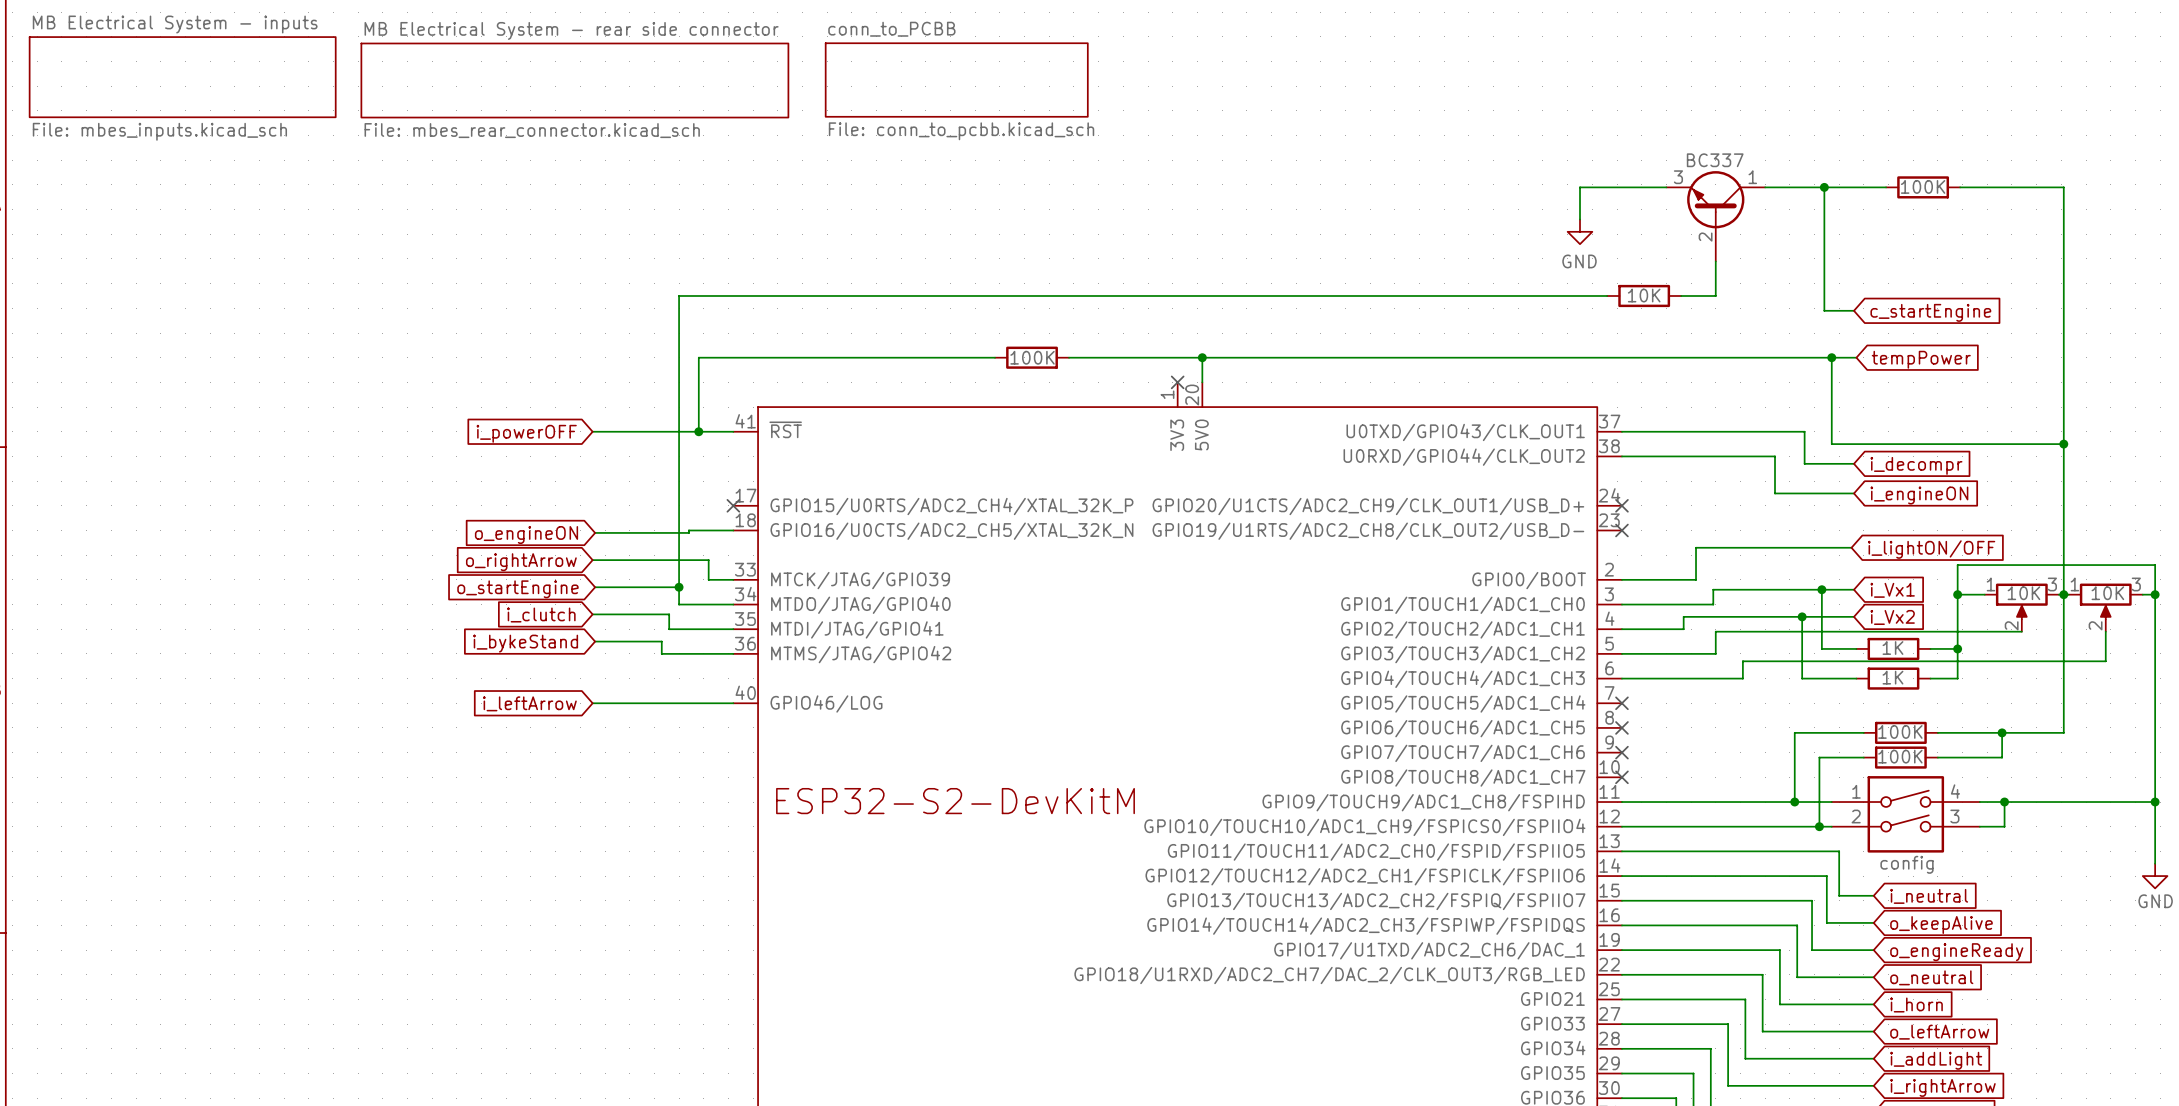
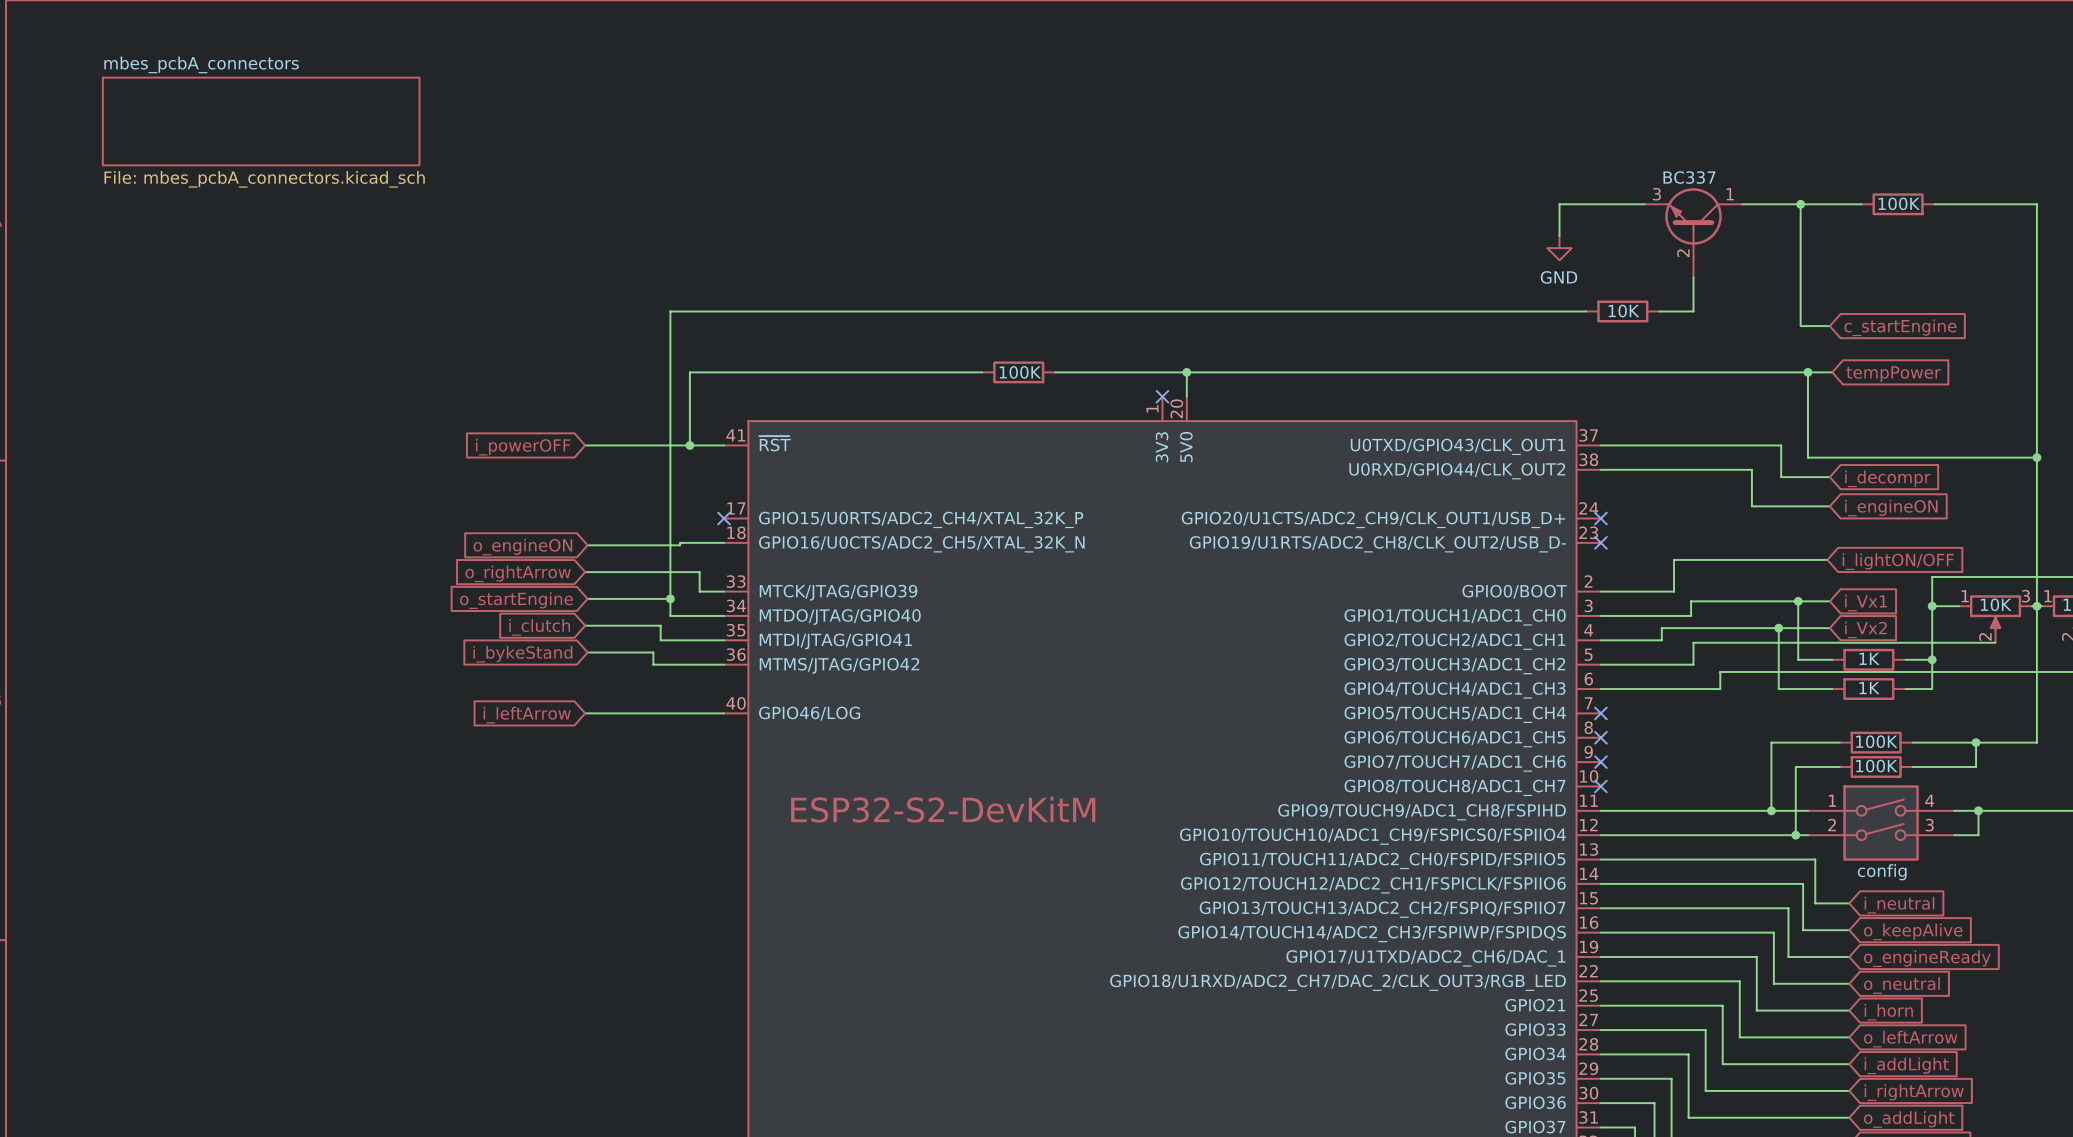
sheet MB Electrical System - inputs: File: mbes_inputs.kicad_sch (182, 77) -> none
sheet MB Electrical System - rear side connector: File: mbes_rear_connector.kicad_sch (574, 80) -> none
sheet conn_to_PCBB: File: conn_to_pcbb.kicad_sch (956, 80) -> none
sheet mbes_pcbA_connectors: none -> File: mbes_pcbA_connectors.kicad_sch (261, 121)

